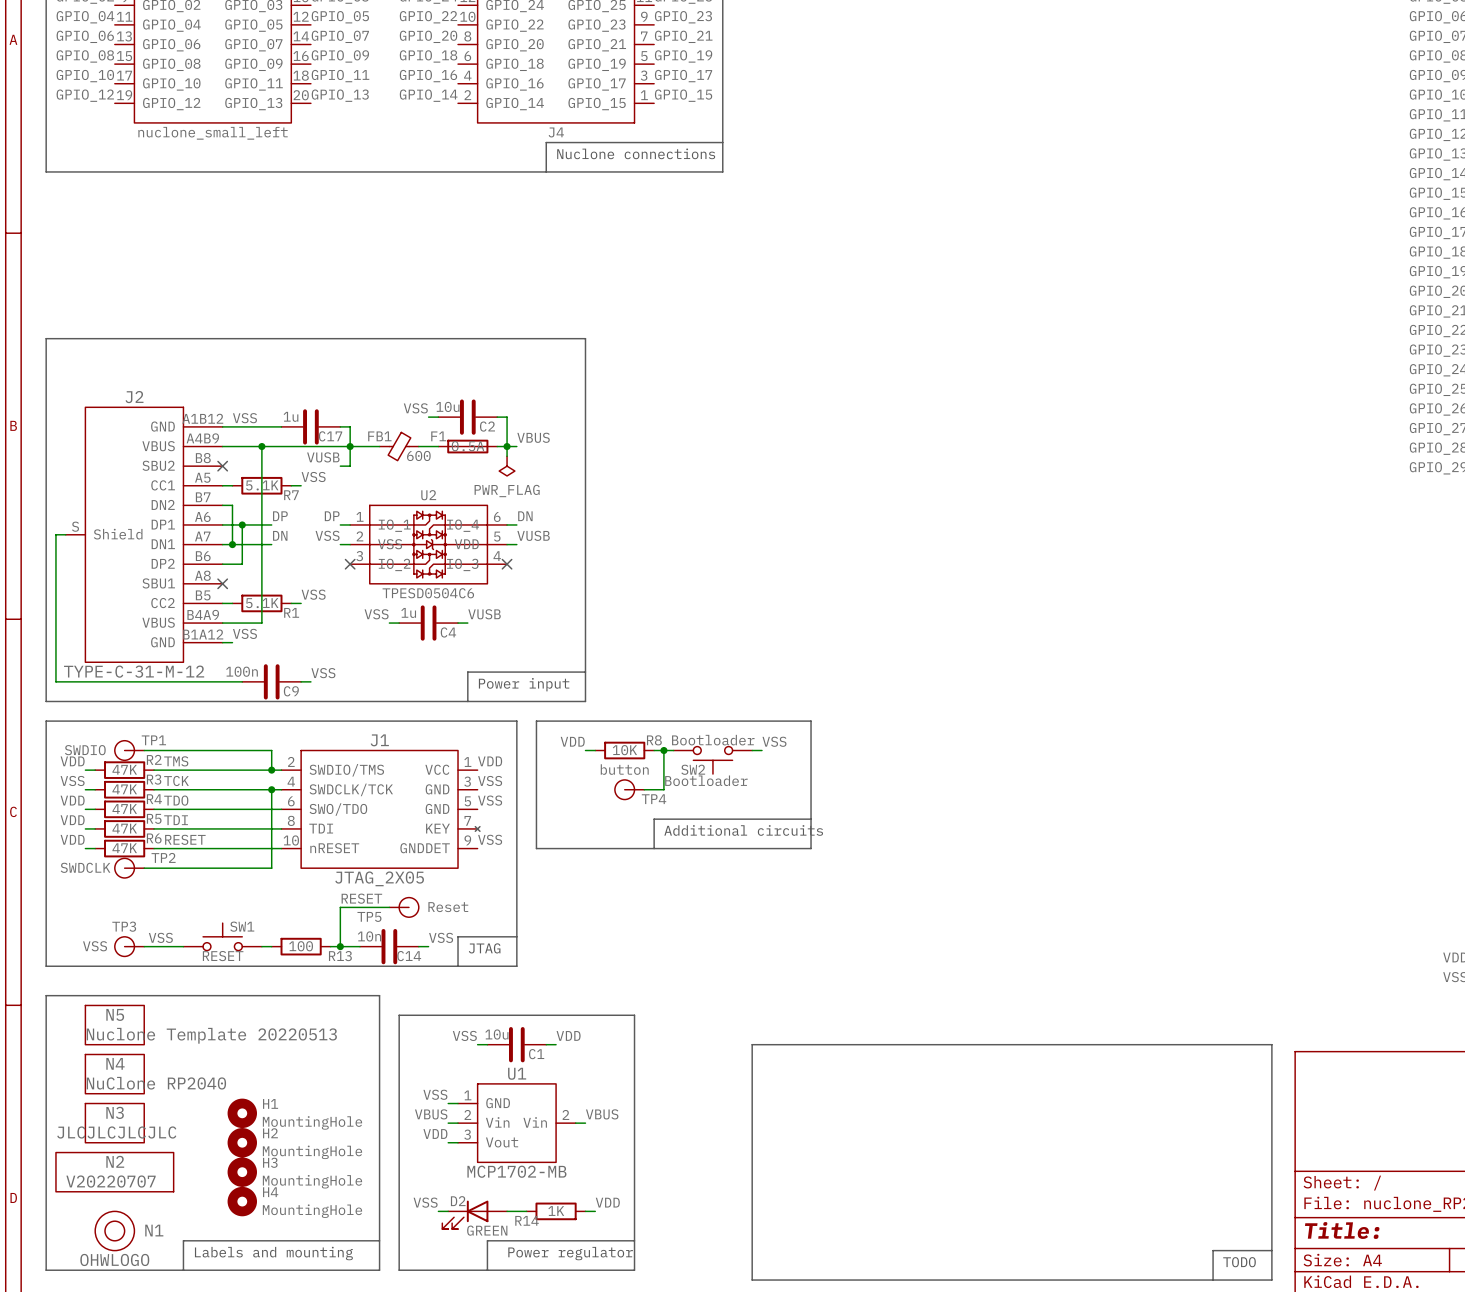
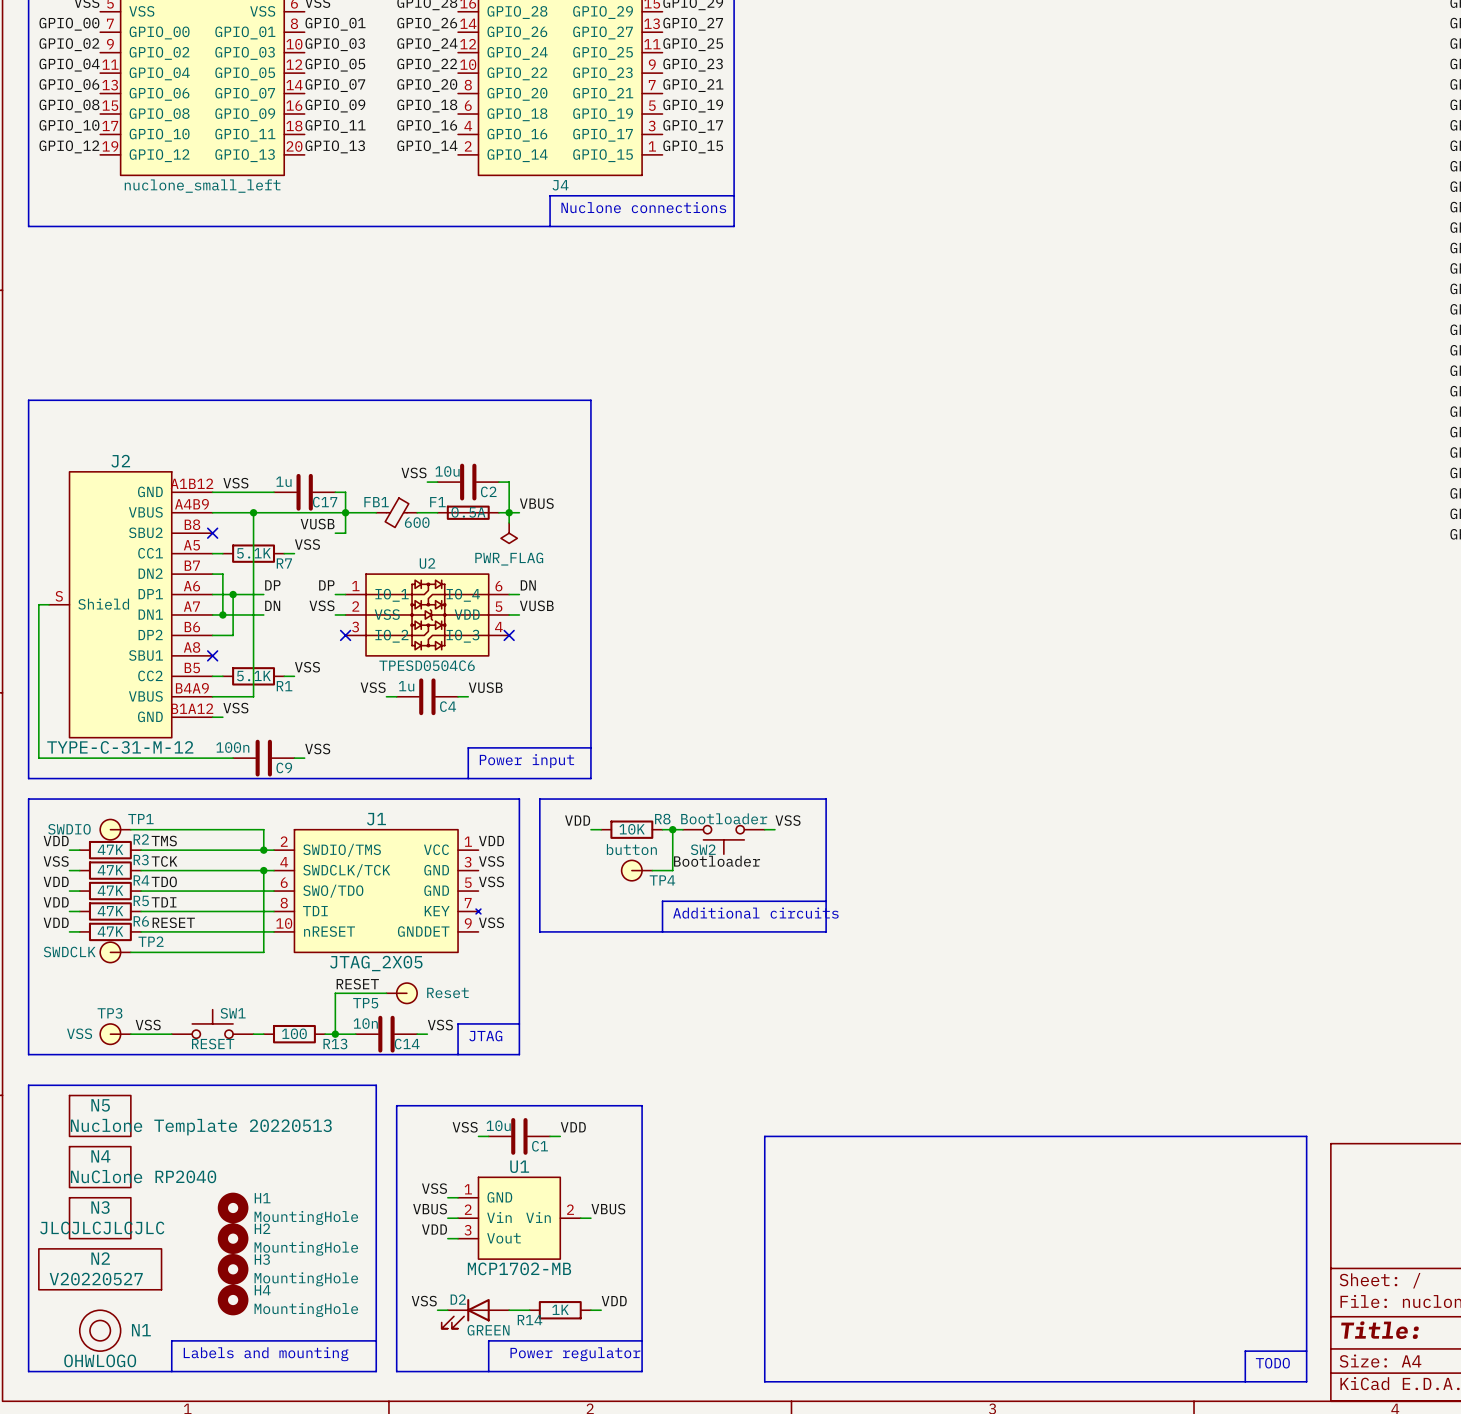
N2 value: V20220707 (111, 1181) -> V20220527 (96, 1279)

